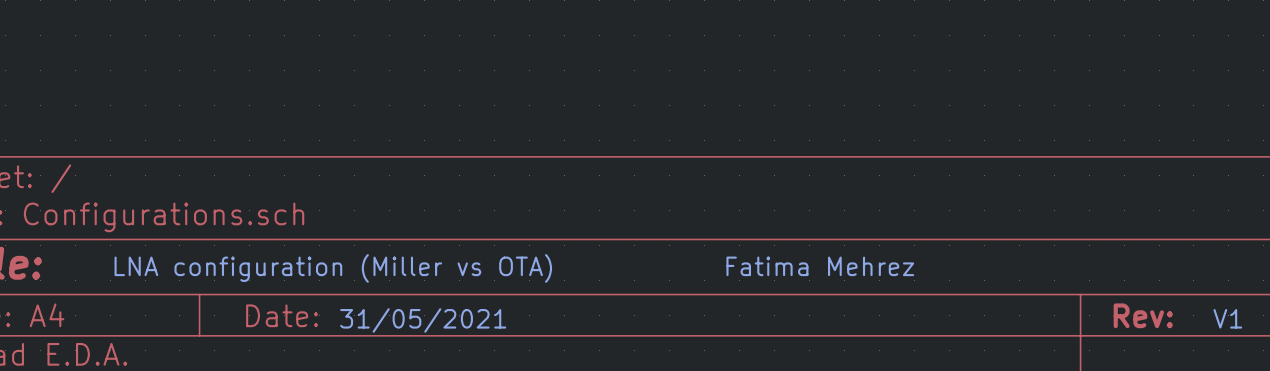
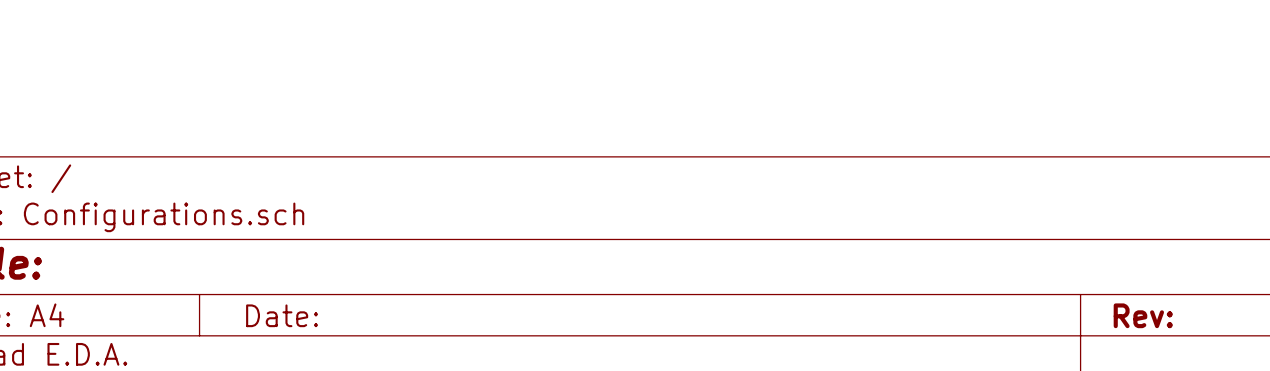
text: Fatima Mehrez (820, 266) -> none
text: LNA configuration (Miller vs OTA) (333, 268) -> none
text: V1 (1227, 318) -> none
text: 31/05/2021 (423, 320) -> none

